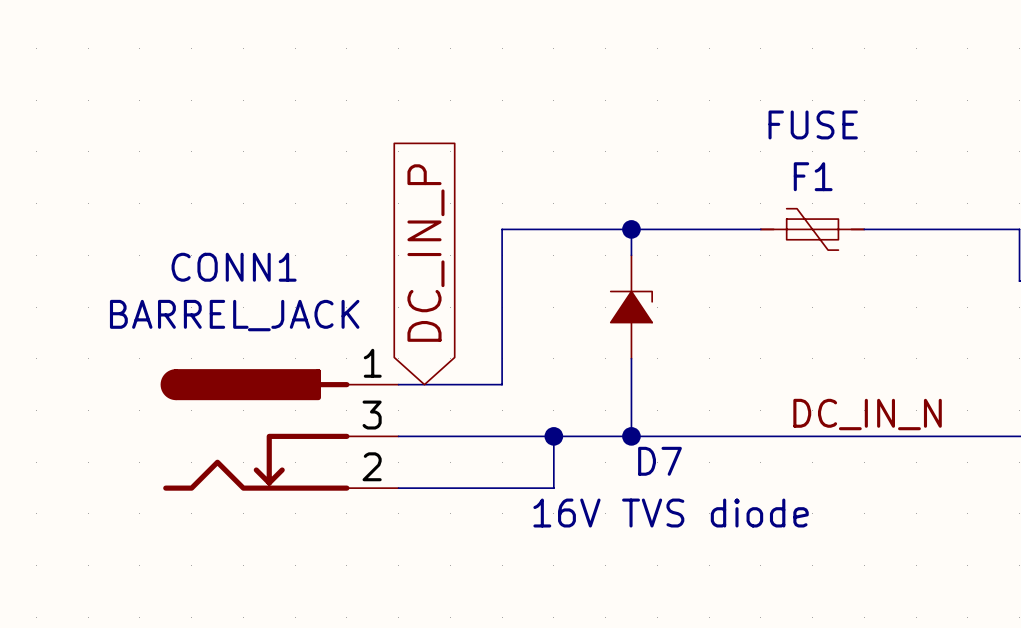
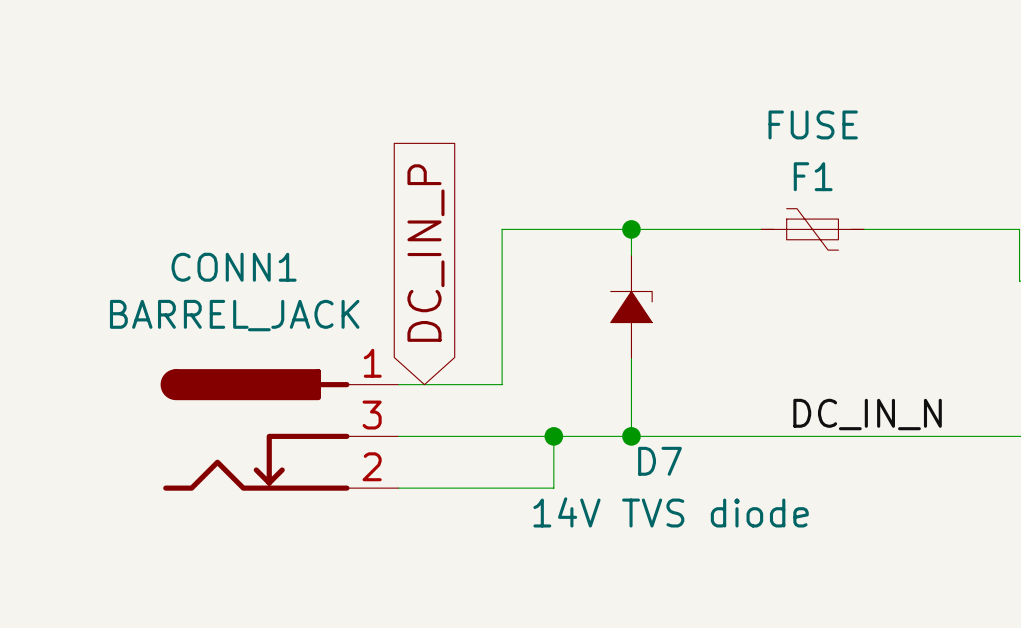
D7 value: 16V TVS diode (671, 513) -> 14V TVS diode (671, 512)

